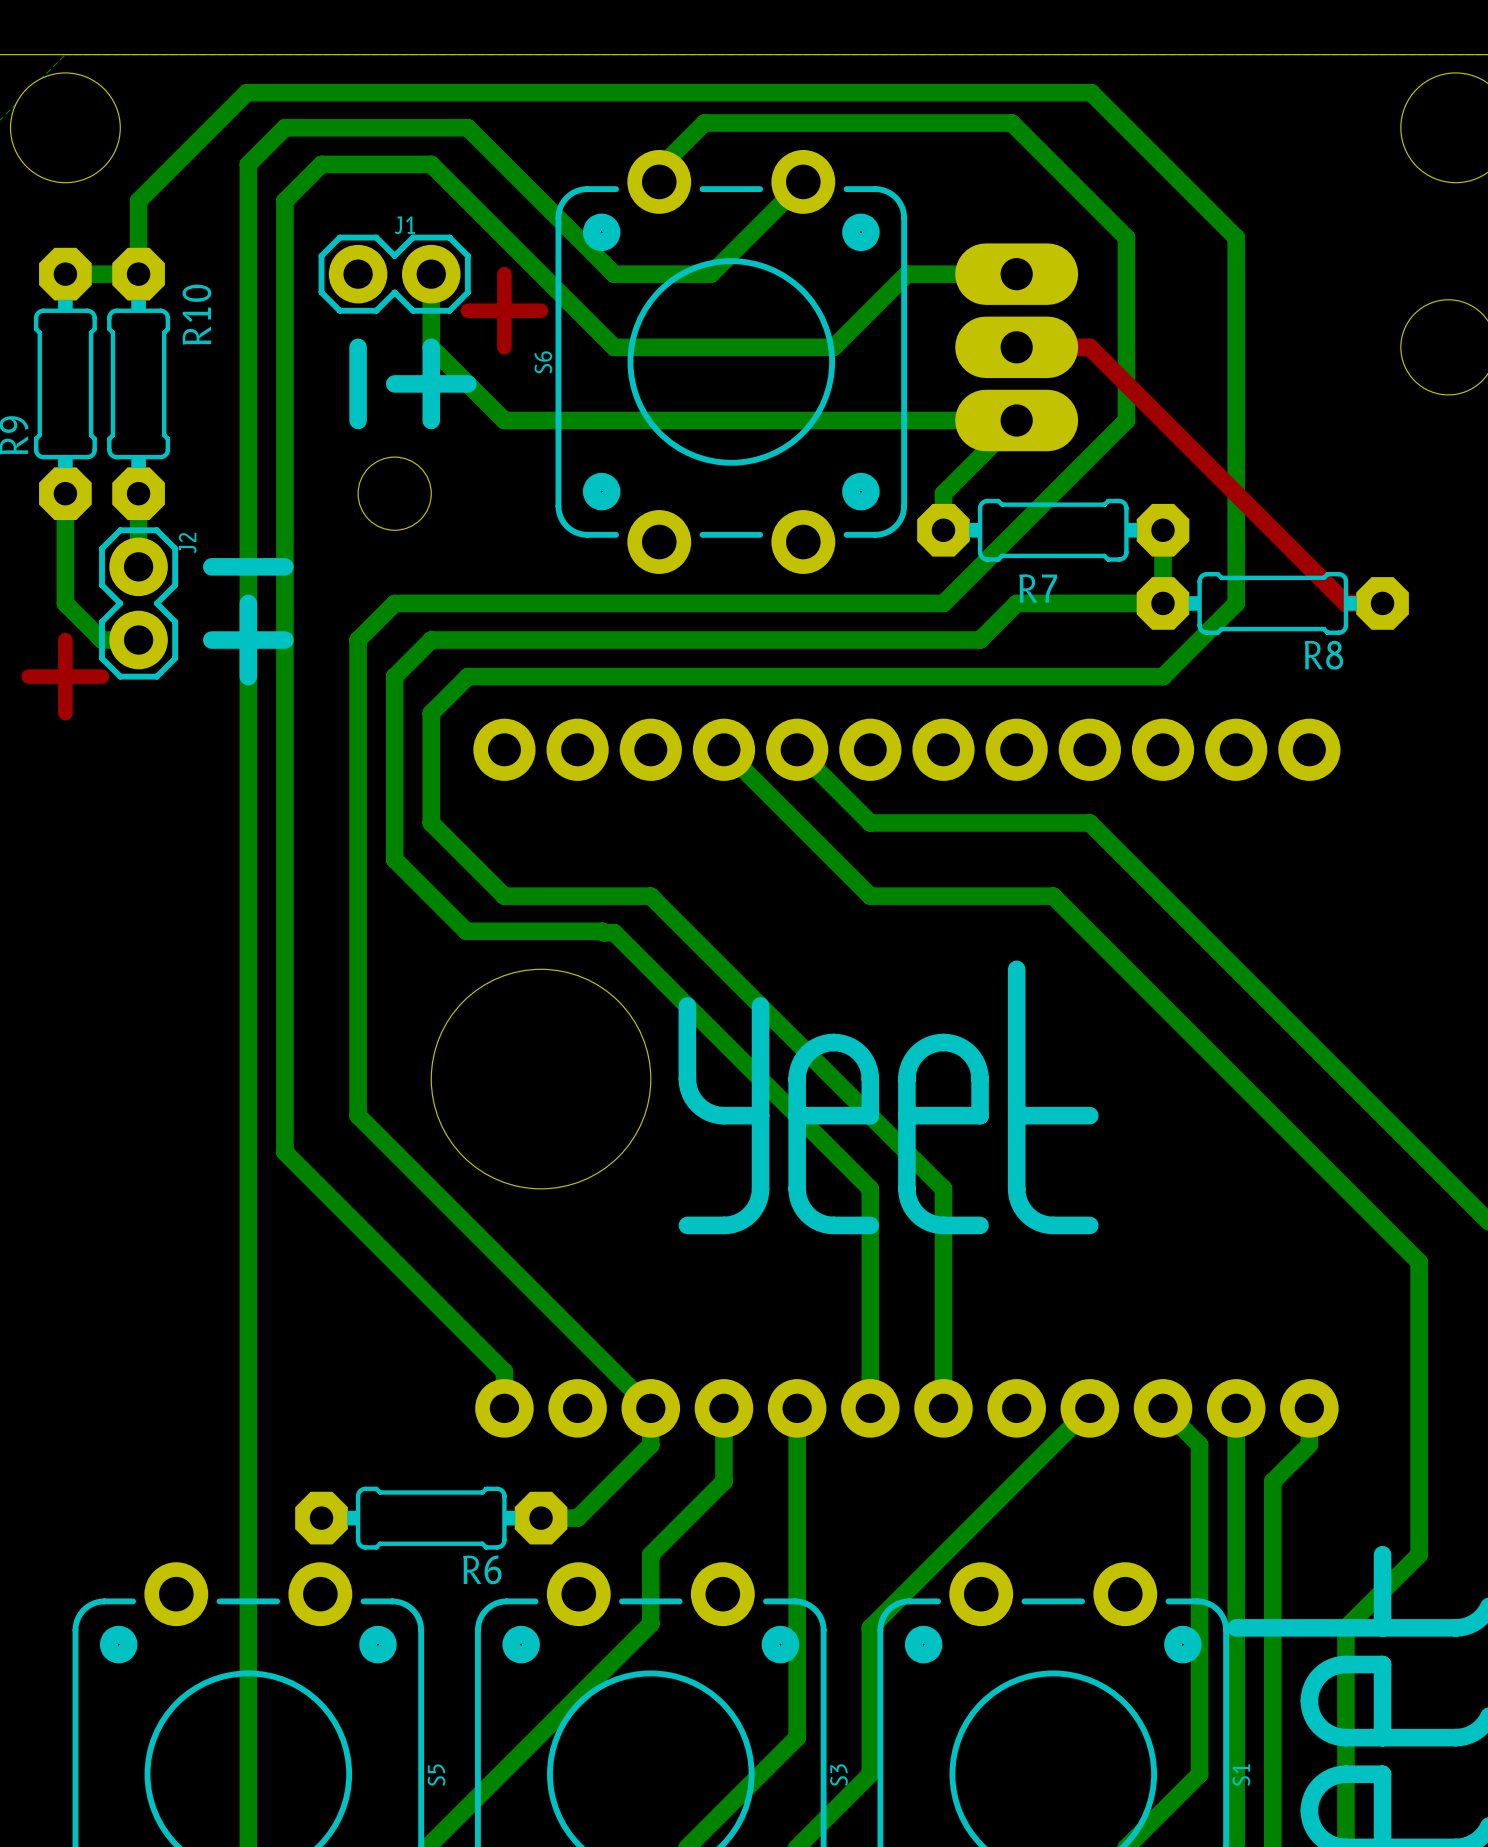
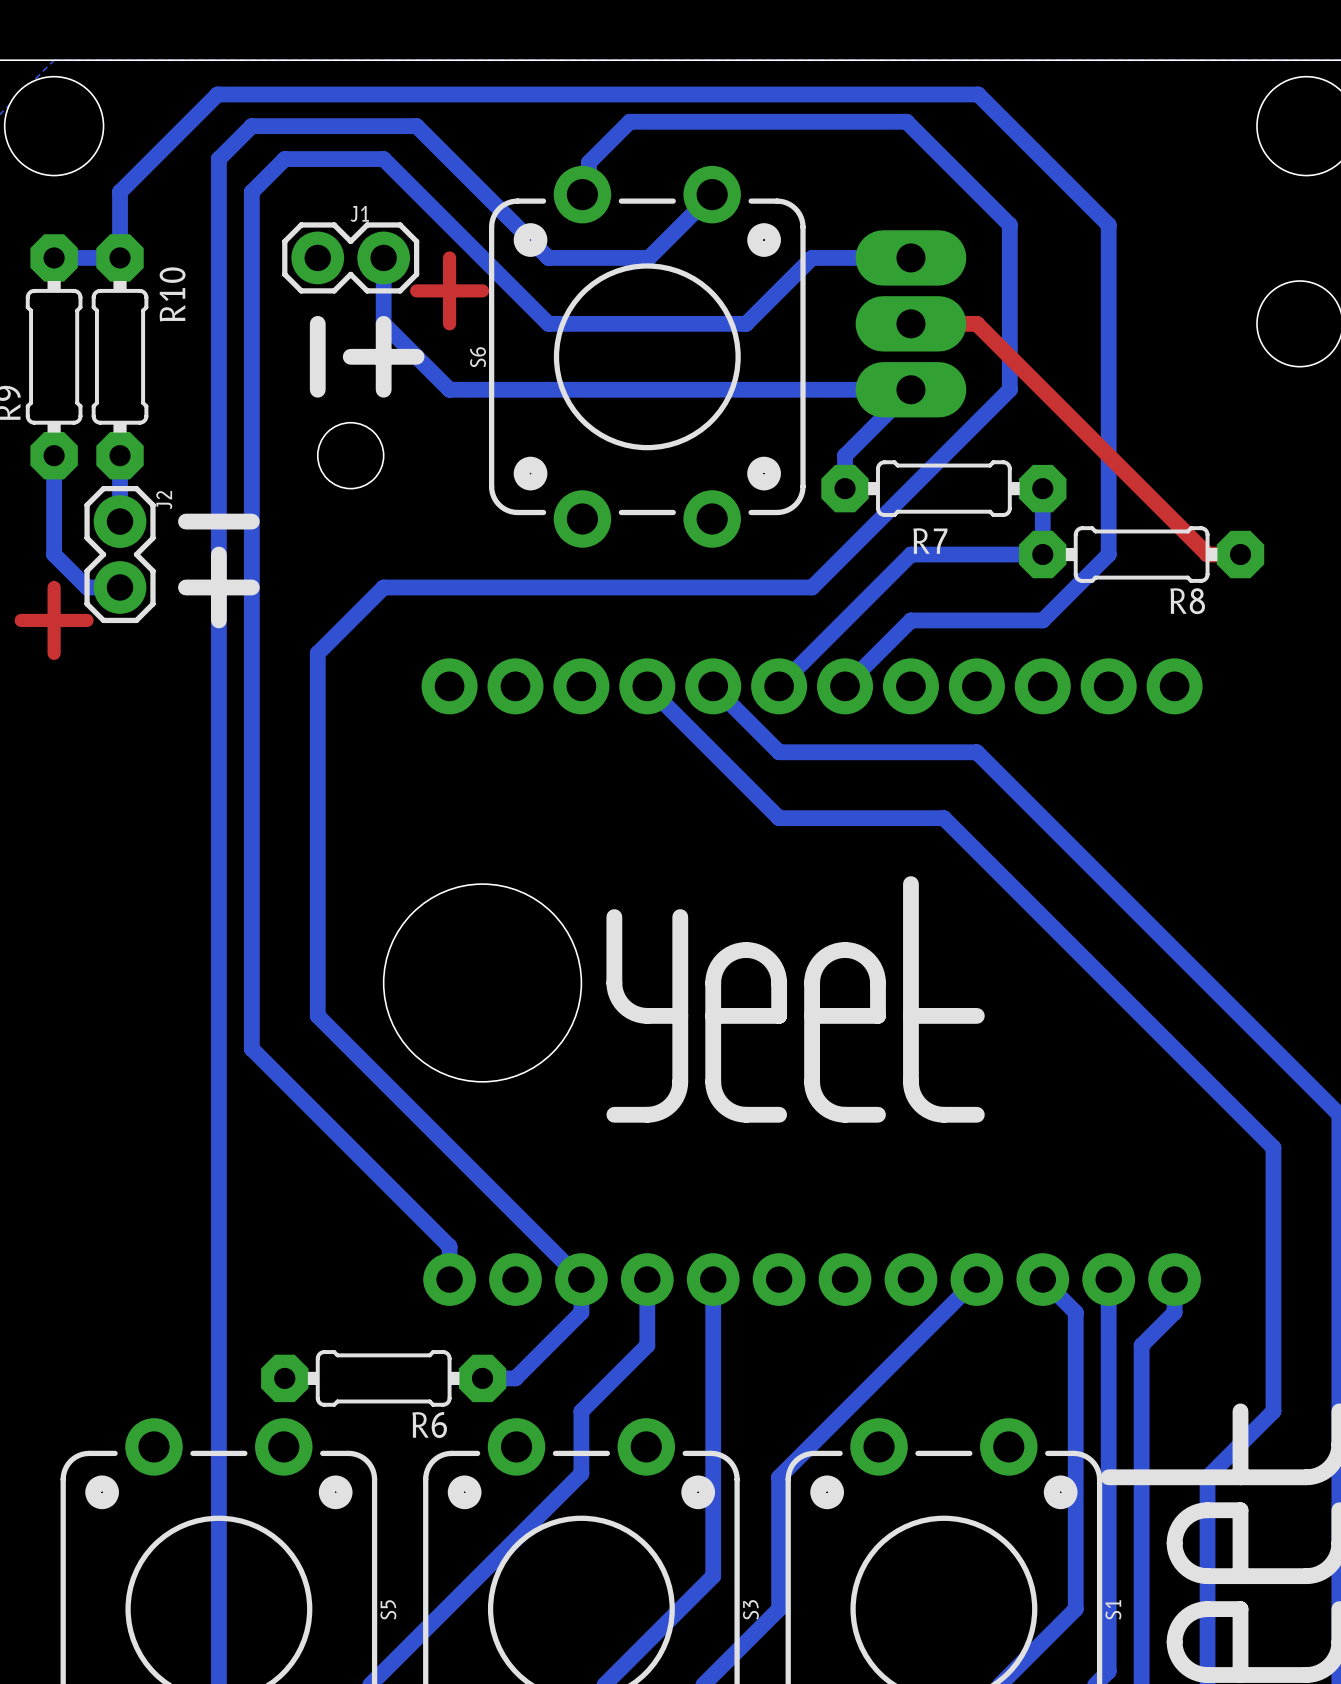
bottom track: (803, 181) (711, 274) -> (712, 194) (648, 257) (635, 257)
S6 position: (731, 361) -> (647, 356)
bottom track: (943, 603) (394, 603) (358, 640) (358, 713) -> (350, 620) (317, 653)
bottom track: (906, 640) (980, 640) -> (812, 587) (845, 554)
bottom track: none -> (877, 587) (779, 686)
bottom track: (394, 676) (394, 859) (466, 931) (614, 932) (870, 1188) (870, 1408) -> none
bottom track: (1016, 676) (467, 676) (431, 713) (431, 822) (504, 896) (650, 896) (943, 1188) (943, 1408) -> (910, 620) (845, 686)

